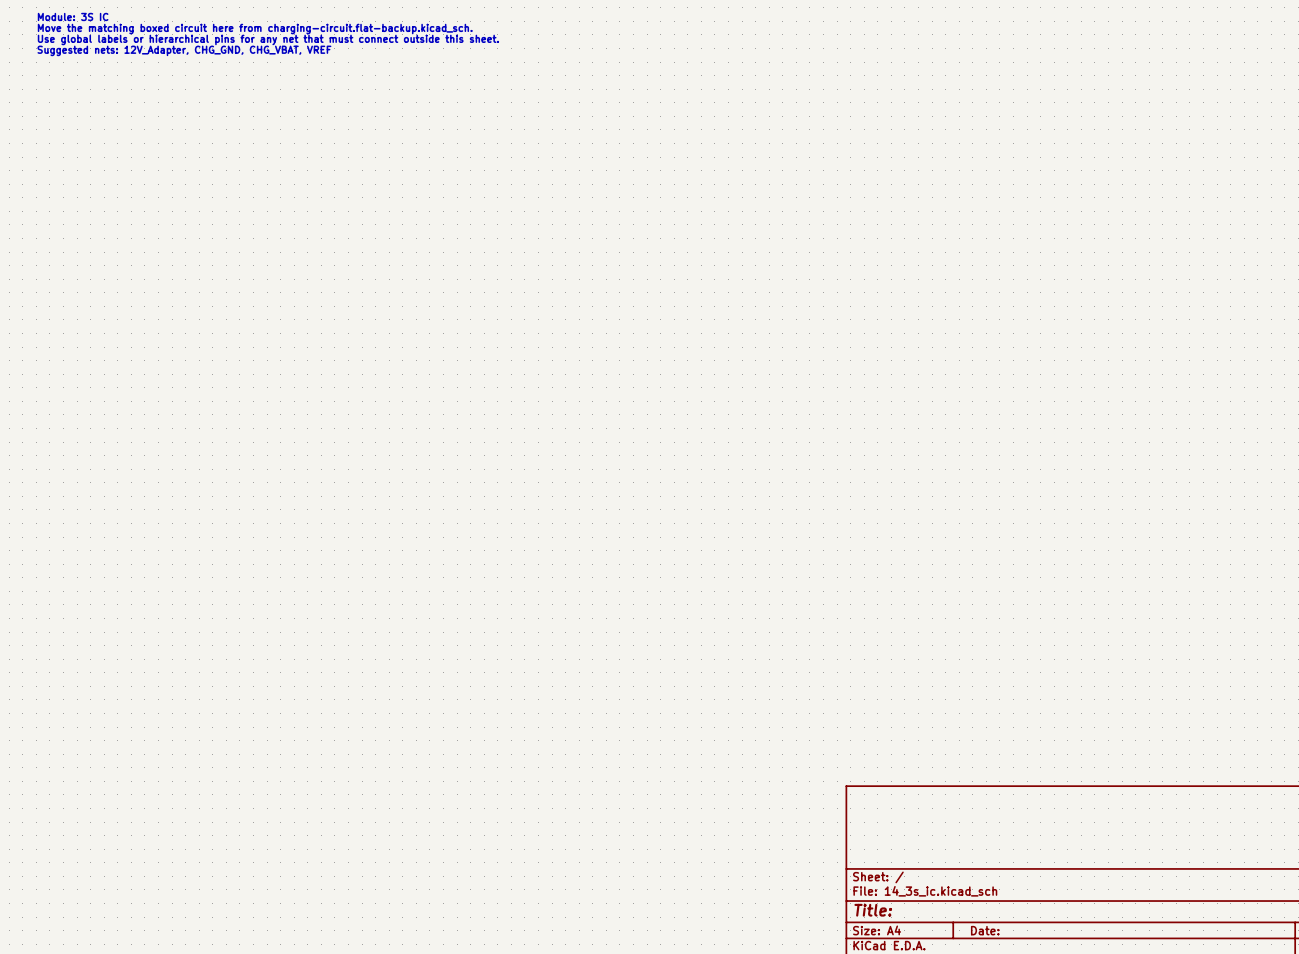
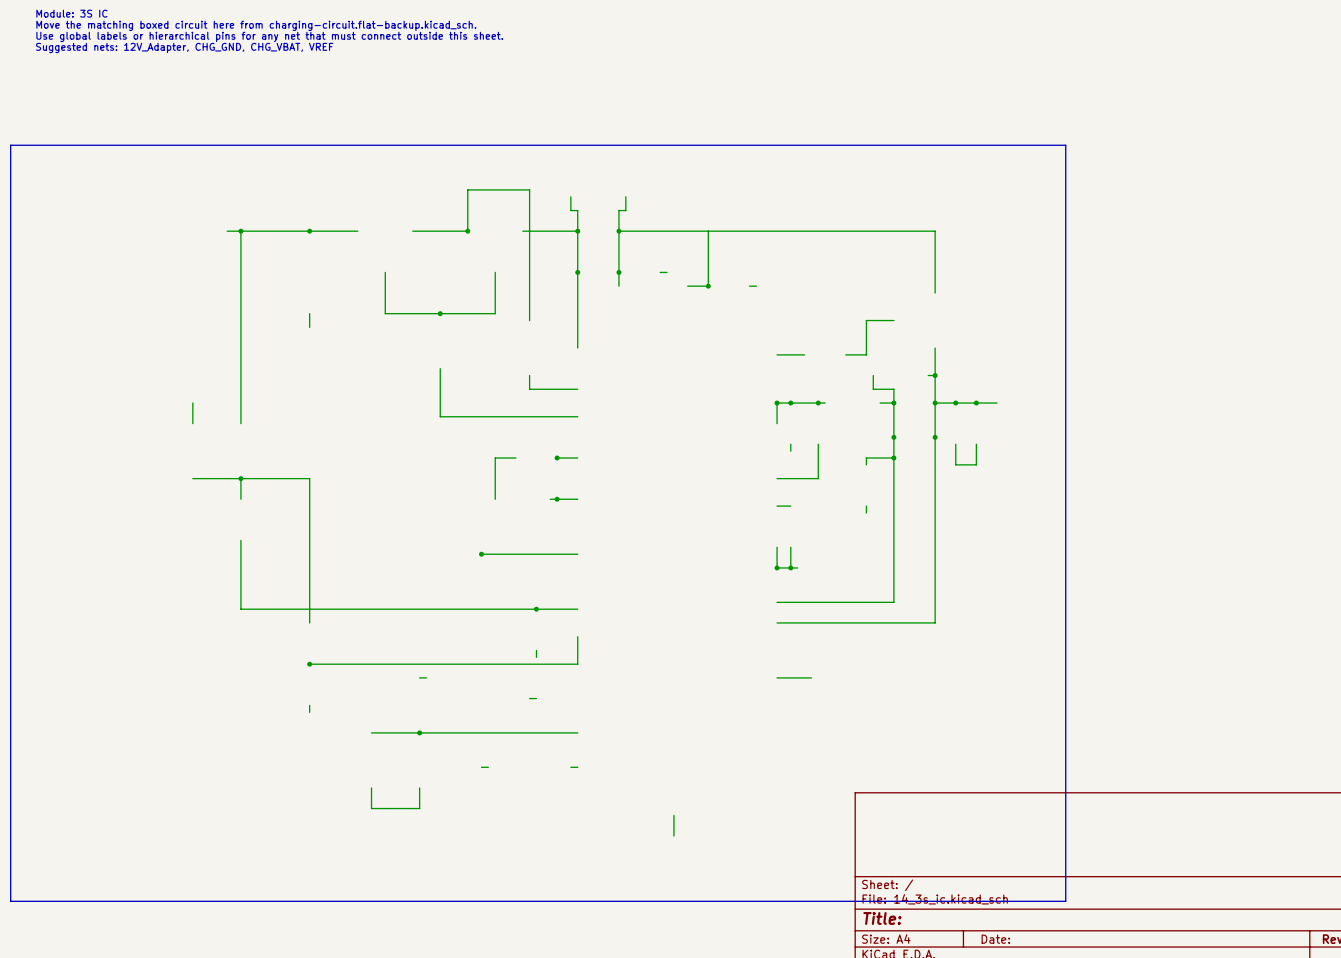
line: none -> (10, 145) (1065, 145) (1065, 901) (10, 901) (10, 145)
wire: none -> (570, 196) (570, 210) (577, 210) (577, 348)
wire: none -> (625, 196) (625, 210) (618, 210) (618, 286)
wire: none -> (227, 231) (357, 231)
wire: none -> (240, 231) (240, 423)
junction: none -> (240, 231)
junction: none -> (309, 231)
wire: none -> (412, 231) (467, 231) (467, 189) (529, 189) (529, 320)
junction: none -> (467, 231)
wire: none -> (522, 231) (577, 231)
junction: none -> (577, 231)
wire: none -> (618, 231) (935, 231) (935, 293)
junction: none -> (618, 231)
wire: none -> (708, 231) (708, 286) (687, 286)
wire: none -> (385, 272) (385, 313) (495, 313) (495, 272)
junction: none -> (577, 272)
junction: none -> (618, 272)
wire: none -> (660, 272) (667, 272)
junction: none -> (708, 286)
wire: none -> (749, 286) (756, 286)
wire: none -> (309, 313) (309, 327)
junction: none -> (440, 313)
wire: none -> (893, 320) (866, 320) (866, 354) (845, 354)
wire: none -> (935, 348) (935, 622) (777, 622)
wire: none -> (777, 354) (804, 354)
wire: none -> (440, 368) (440, 416) (577, 416)
wire: none -> (529, 375) (529, 389) (577, 389)
wire: none -> (873, 375) (873, 389) (893, 389) (893, 602) (777, 602)
wire: none -> (928, 375) (935, 375)
junction: none -> (935, 375)
wire: none -> (192, 403) (192, 423)
junction: none -> (777, 403)
junction: none -> (790, 403)
junction: none -> (818, 403)
wire: none -> (825, 403) (777, 403) (777, 423)
wire: none -> (880, 403) (893, 403)
junction: none -> (893, 403)
wire: none -> (935, 403) (996, 403)
junction: none -> (935, 403)
junction: none -> (955, 403)
junction: none -> (976, 403)
junction: none -> (893, 437)
junction: none -> (935, 437)
wire: none -> (790, 444) (790, 451)
wire: none -> (818, 444) (818, 478) (777, 478)
wire: none -> (955, 444) (955, 464) (976, 464) (976, 444)
wire: none -> (515, 458) (495, 458) (495, 499)
wire: none -> (557, 458) (577, 458)
junction: none -> (557, 458)
wire: none -> (893, 458) (866, 458) (866, 464)
junction: none -> (893, 458)
wire: none -> (192, 478) (309, 478) (309, 622)
wire: none -> (240, 478) (240, 499)
junction: none -> (240, 478)
wire: none -> (550, 499) (577, 499)
junction: none -> (557, 499)
wire: none -> (777, 506) (790, 506)
wire: none -> (866, 506) (866, 512)
wire: none -> (240, 540) (240, 609) (577, 609)
wire: none -> (777, 547) (777, 567) (797, 567)
wire: none -> (790, 547) (790, 567)
wire: none -> (481, 554) (577, 554)
junction: none -> (481, 554)
junction: none -> (777, 567)
junction: none -> (790, 567)
junction: none -> (536, 609)
wire: none -> (577, 636) (577, 664) (309, 664)
wire: none -> (536, 650) (536, 657)
junction: none -> (309, 664)
wire: none -> (419, 677) (426, 677)
wire: none -> (777, 677) (811, 677)
wire: none -> (529, 698) (536, 698)
wire: none -> (309, 705) (309, 712)
wire: none -> (371, 732) (577, 732)
junction: none -> (419, 732)
wire: none -> (481, 767) (488, 767)
wire: none -> (570, 767) (577, 767)
wire: none -> (371, 787) (371, 808) (419, 808) (419, 787)
wire: none -> (673, 815) (673, 836)

